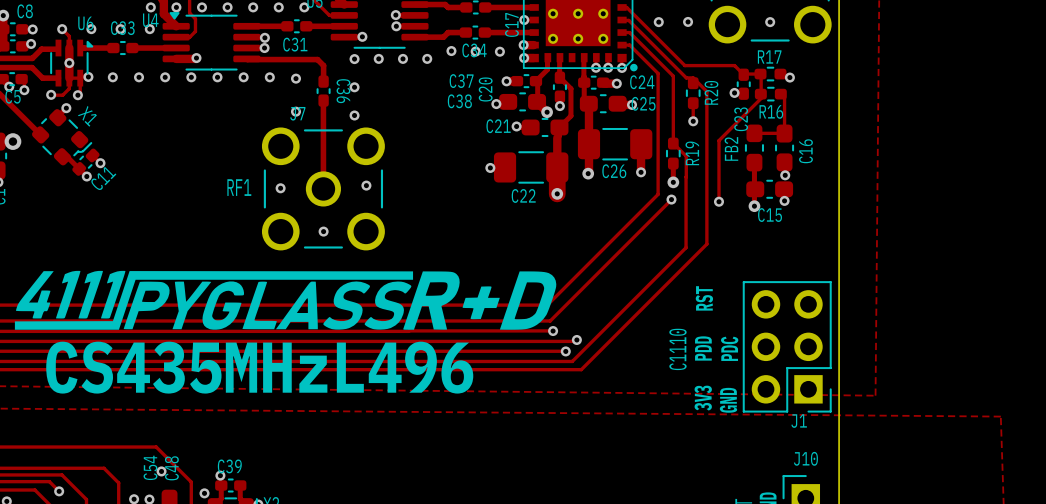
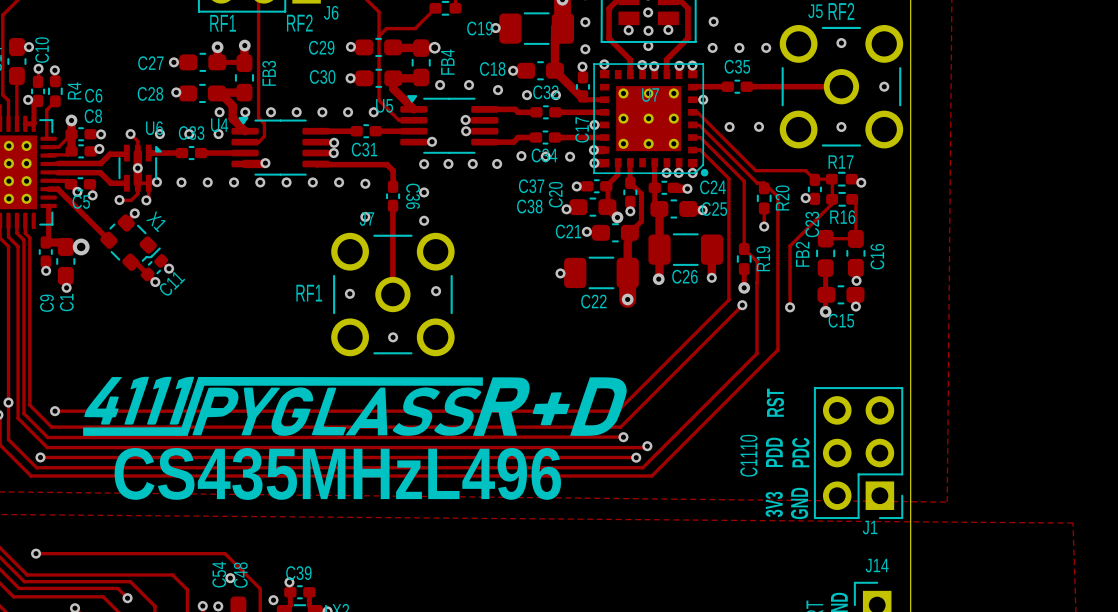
J10 name: J10 (805, 458) -> J14 (877, 565)

